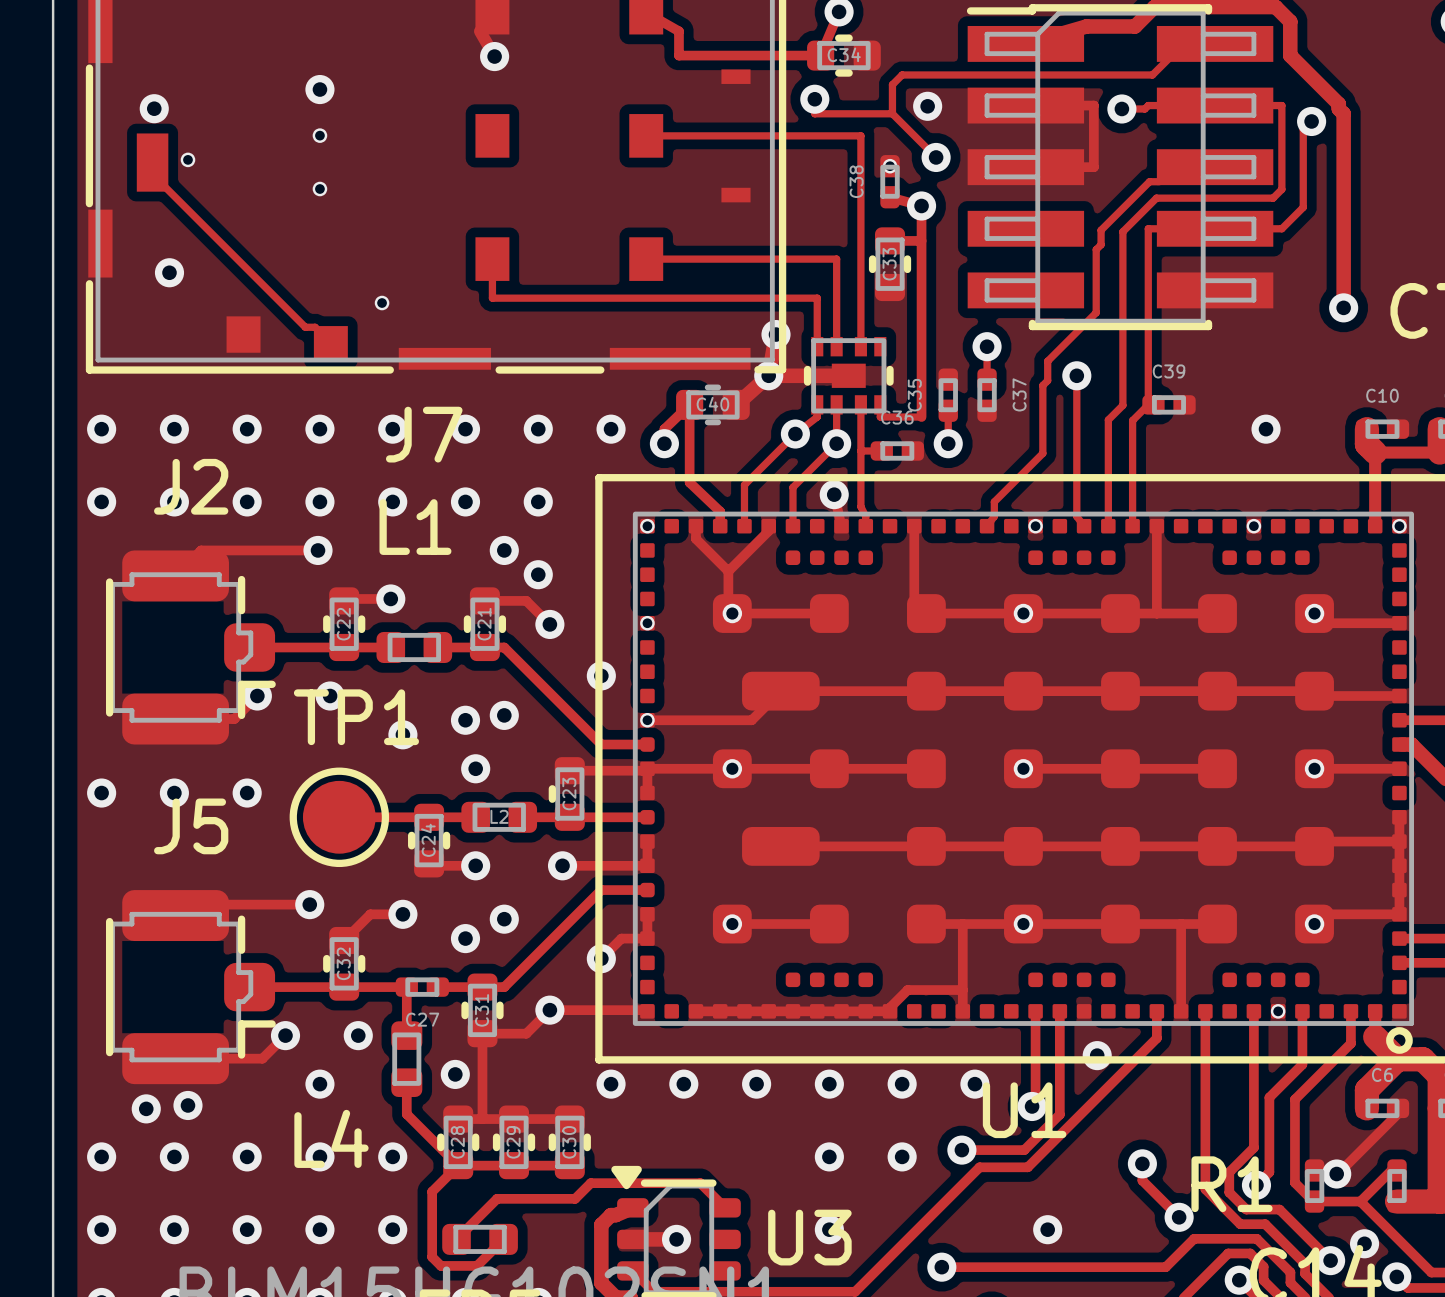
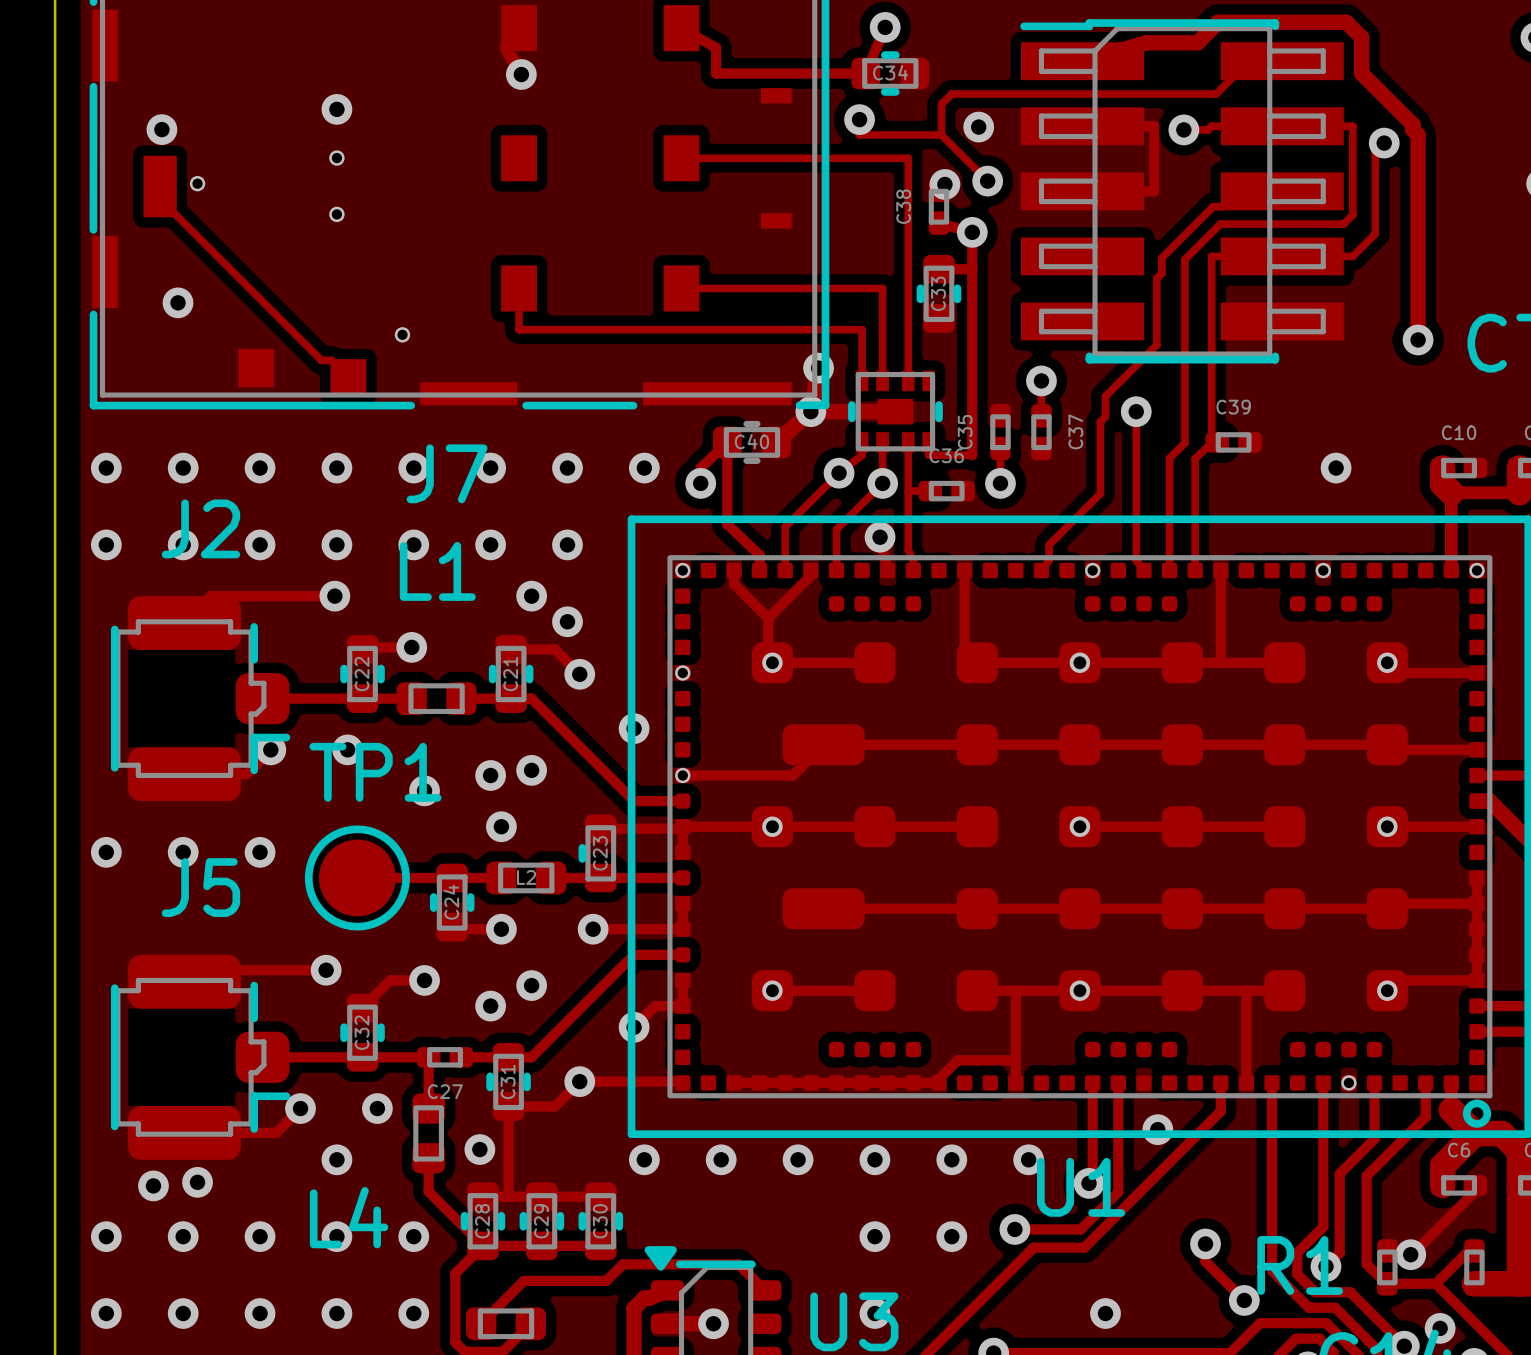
via size: [882, 158, 898, 174] -> [929, 169, 961, 200]

